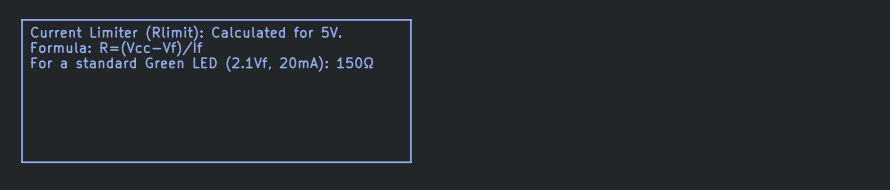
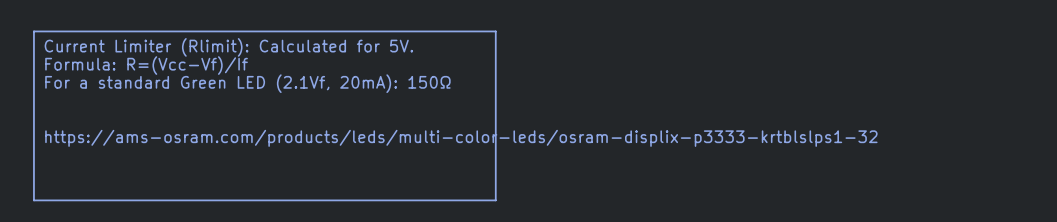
text: none -> https://ams-osram.com/products/leds/multi-color-leds/osram-displix-p3333-krtblslps1-32 (461, 138)

